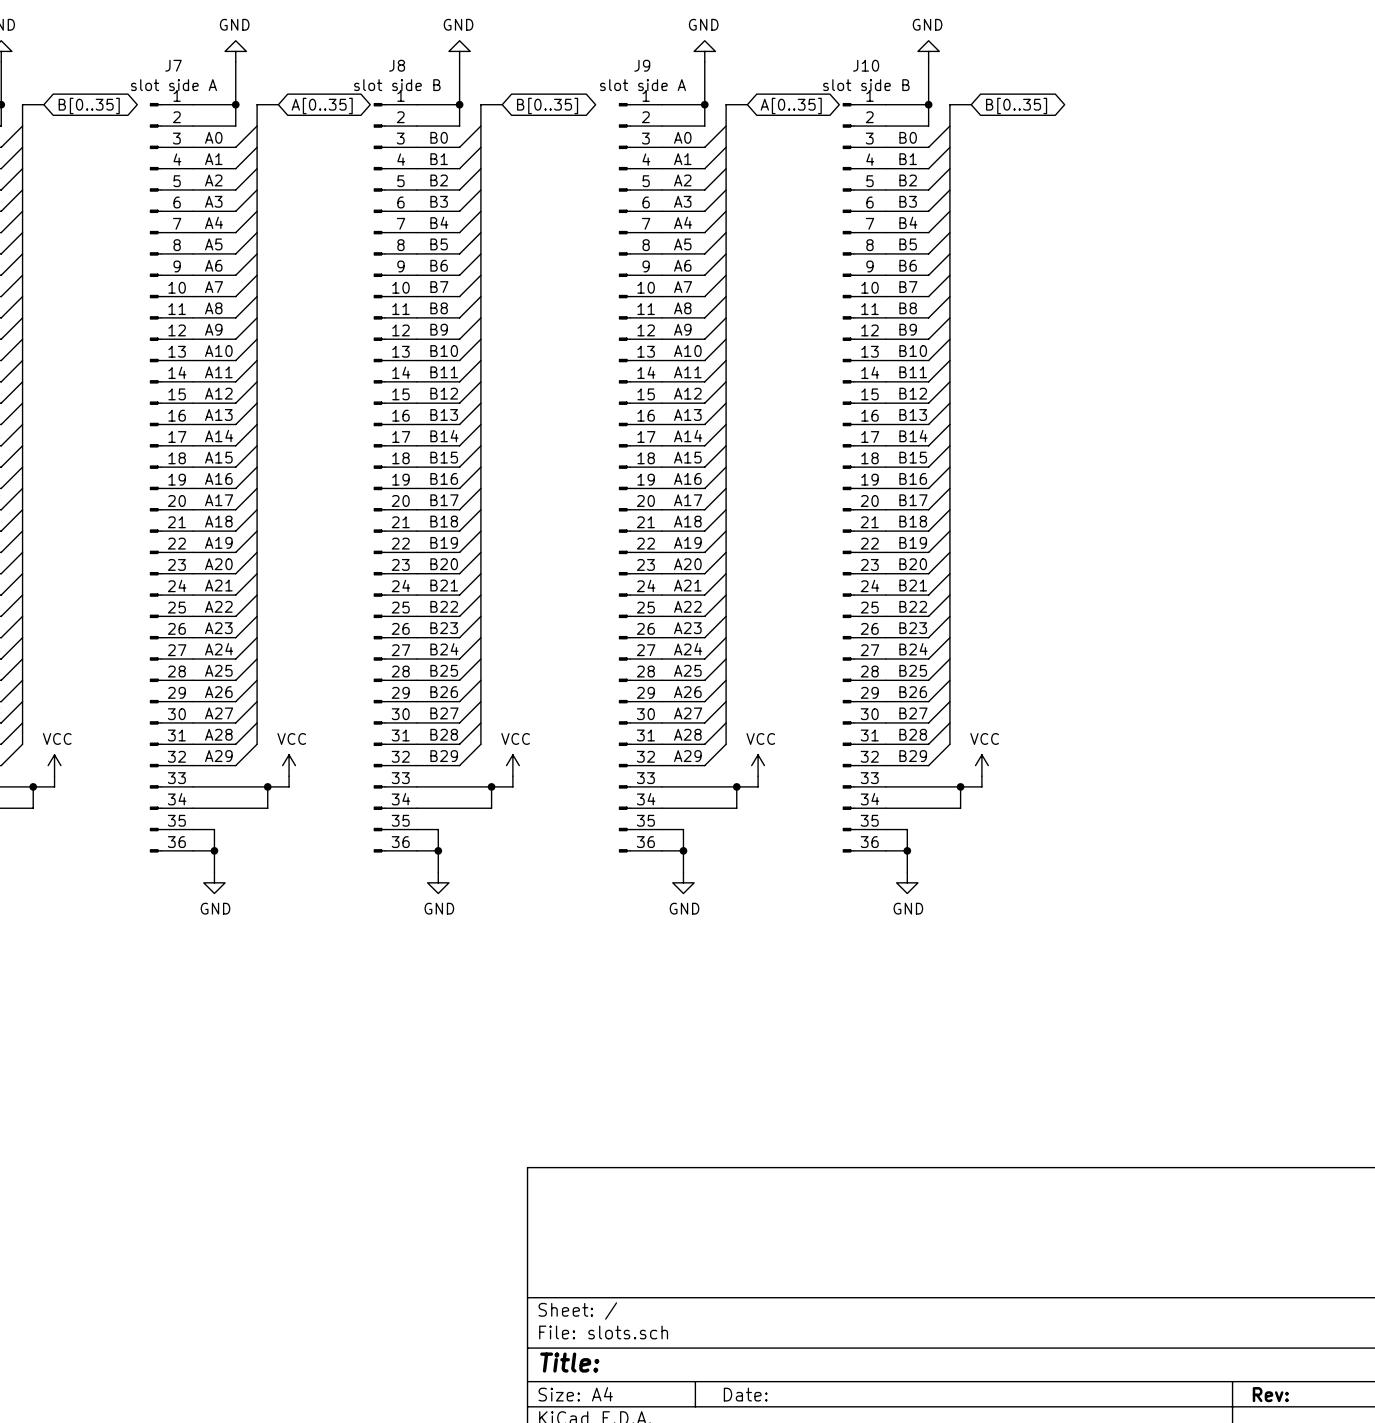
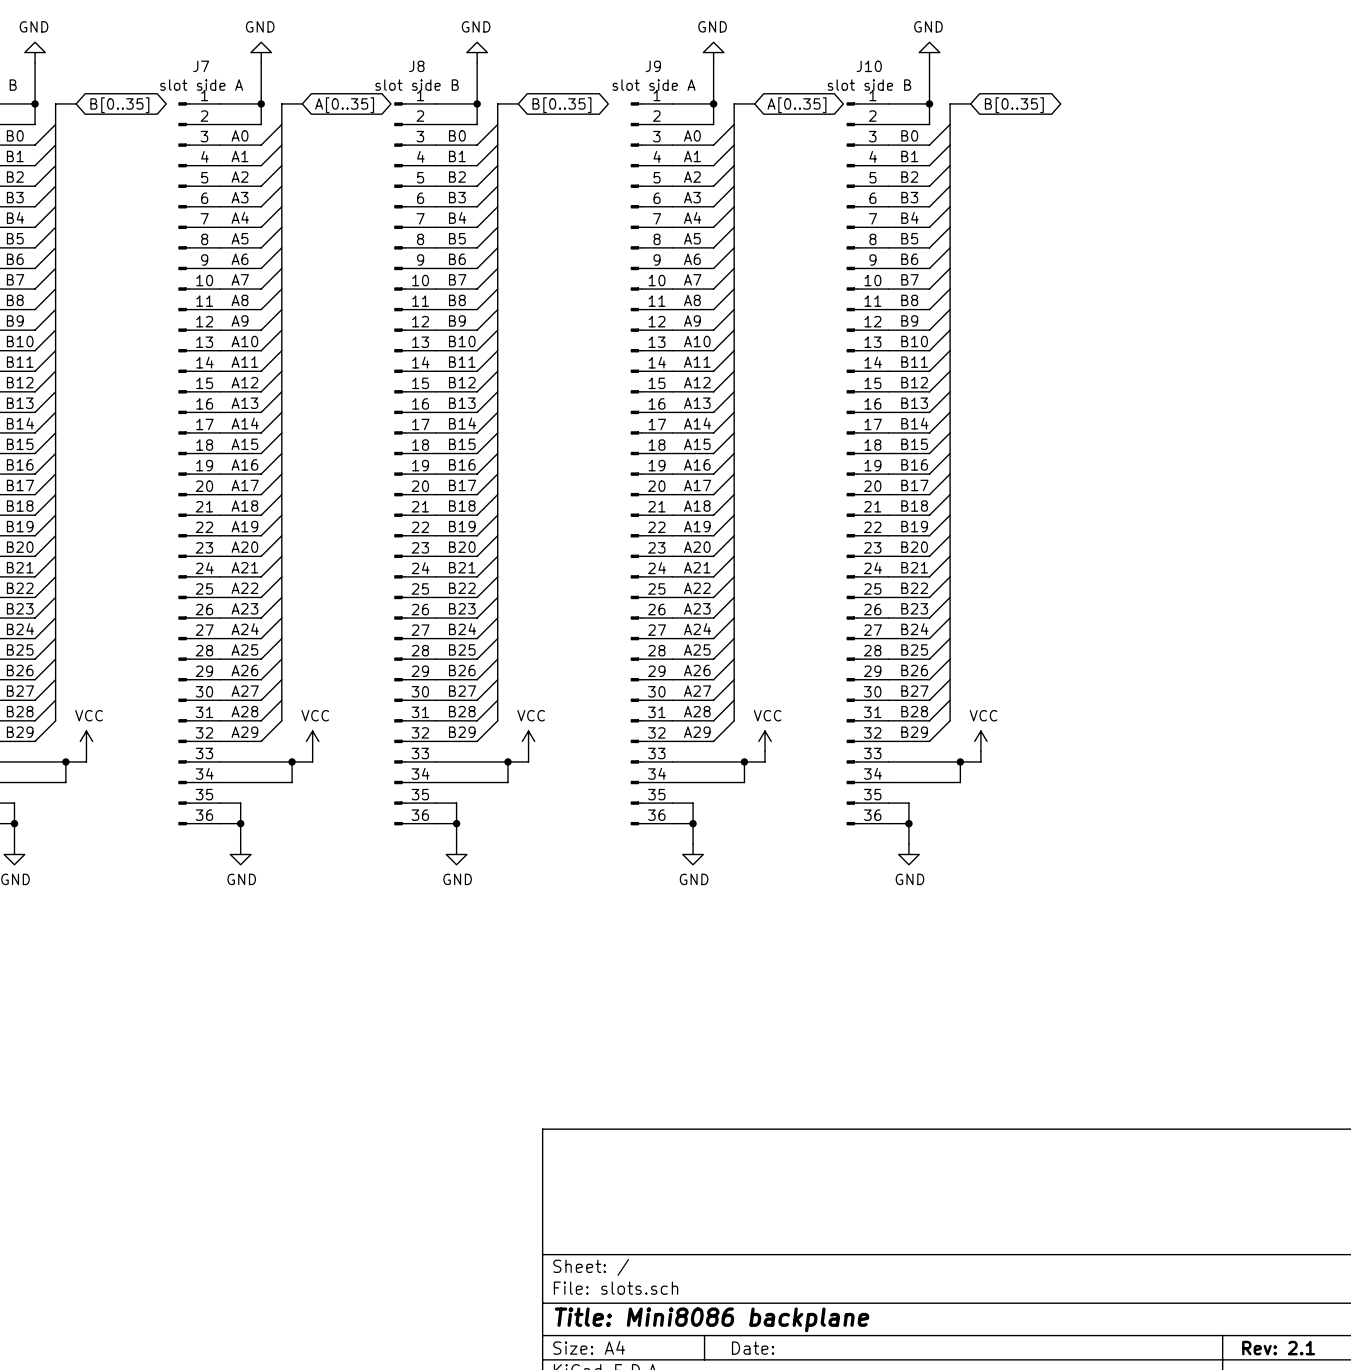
title block: Title: (569, 1362) -> Title: Mini8086 backplane (712, 1319)
title block: Rev: (1270, 1394) -> Rev: 2.1 (1278, 1348)

